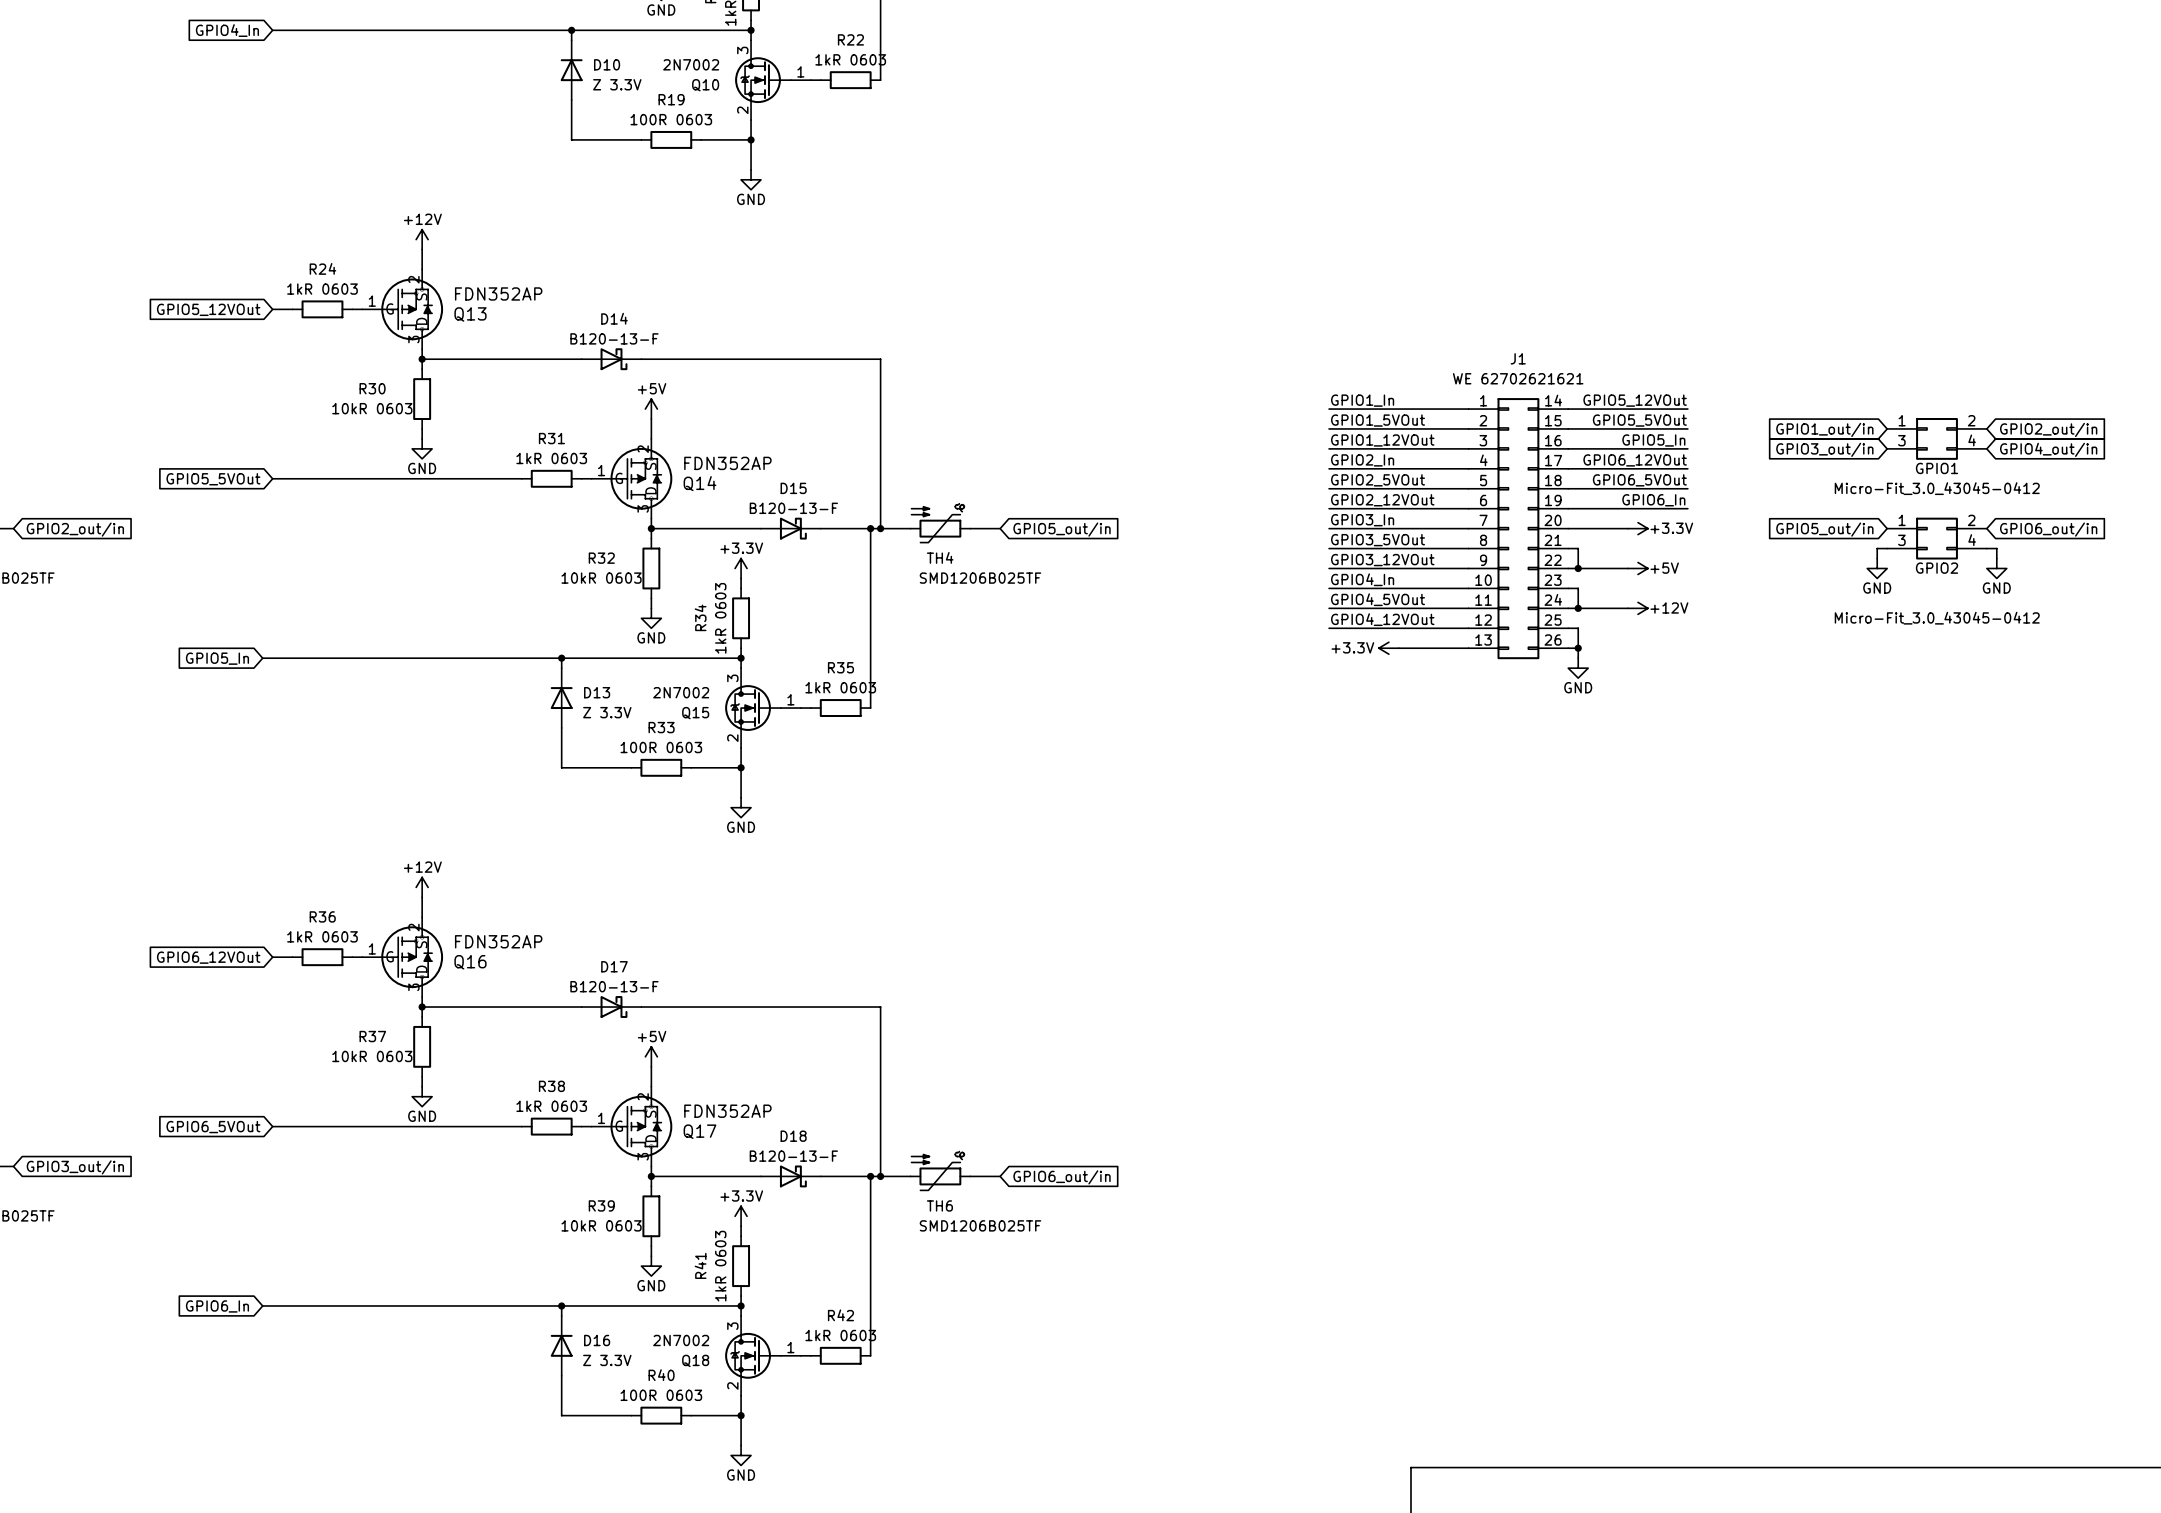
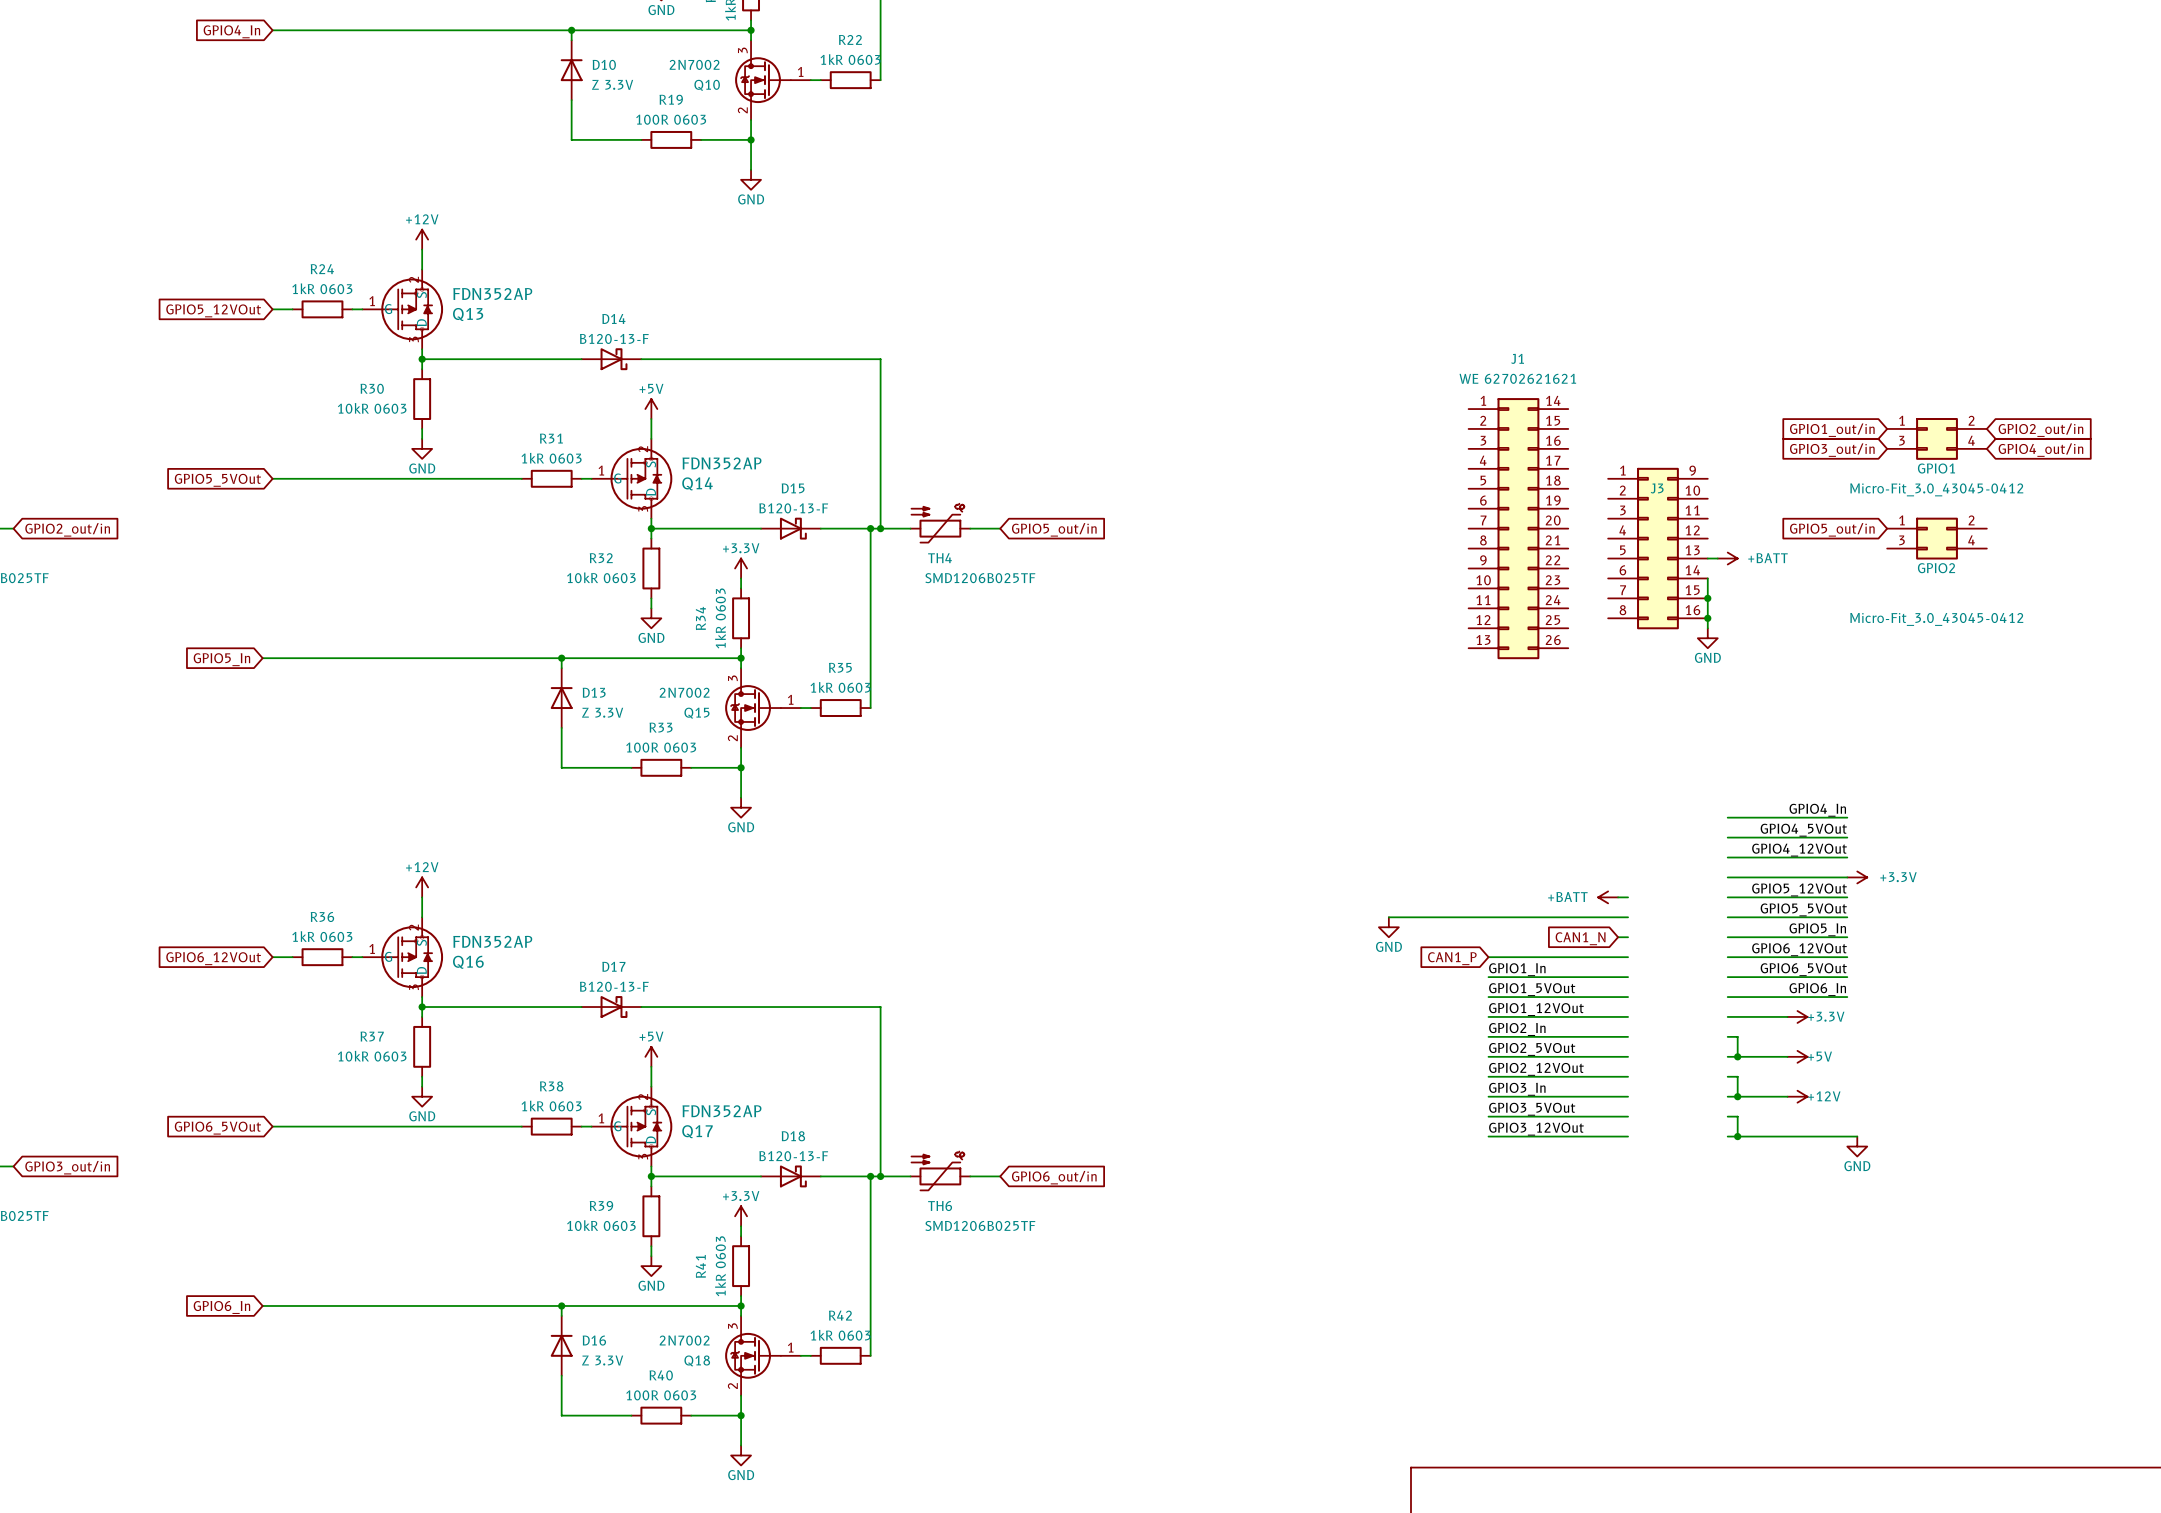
label: GPIO1_In (1362, 400) -> none
label: GPIO5_12VOut (1635, 400) -> none
wire: (1329, 409) (1468, 409) -> none
wire: (1568, 409) (1687, 409) -> none
label: GPIO1_5VOut (1378, 420) -> none
label: GPIO5_5VOut (1639, 420) -> none
wire: (1329, 428) (1468, 428) -> none
wire: (1568, 428) (1687, 428) -> none
label: GPIO1_12VOut (1382, 440) -> none
label: GPIO5_In (1653, 440) -> none
wire: (1329, 448) (1468, 448) -> none
wire: (1568, 448) (1687, 448) -> none
label: GPIO2_In (1362, 460) -> none
label: GPIO6_12VOut (1635, 460) -> none
wire: (1329, 468) (1468, 468) -> none
wire: (1568, 468) (1687, 468) -> none
label: GPIO2_5VOut (1378, 480) -> none
label: GPIO6_5VOut (1639, 480) -> none
wire: (1329, 488) (1468, 488) -> none
wire: (1568, 488) (1687, 488) -> none
label: GPIO2_12VOut (1382, 500) -> none
label: GPIO6_In (1653, 500) -> none
wire: (1329, 508) (1468, 508) -> none
wire: (1568, 508) (1687, 508) -> none
label: GPIO3_In (1362, 520) -> none
wire: (1329, 528) (1468, 528) -> none
wire: (1568, 528) (1628, 528) -> none
power symbol: +3.3V (1638, 528) -> none
global label: GPIO6_out/in (2048, 529) -> none
label: GPIO3_5VOut (1378, 540) -> none
wire: (1329, 548) (1468, 548) -> none
wire: (1568, 548) (1578, 548) (1578, 568) -> none
J3: none -> (1657, 548)
wire: (1887, 548) (1877, 548) (1877, 558) -> none
wire: (1986, 548) (1996, 548) (1996, 558) -> none
power symbol: none -> +BATT (1727, 558)
label: GPIO3_12VOut (1382, 560) -> none
wire: (1329, 568) (1468, 568) -> none
wire: (1568, 568) (1628, 568) -> none
junction: (1578, 568) -> none
power symbol: +5V (1638, 568) -> none
power symbol: GND (1877, 568) -> none
power symbol: GND (1996, 568) -> none
wire: none -> (1707, 578) (1707, 628)
label: GPIO4_In (1362, 579) -> none
wire: (1329, 588) (1468, 588) -> none
wire: (1568, 588) (1578, 588) (1578, 608) -> none
junction: none -> (1707, 598)
label: GPIO4_5VOut (1378, 599) -> none
wire: (1329, 608) (1468, 608) -> none
wire: (1568, 608) (1628, 608) -> none
junction: (1578, 608) -> none
power symbol: +12V (1638, 608) -> none
junction: none -> (1707, 618)
label: GPIO4_12VOut (1382, 619) -> none
wire: (1329, 628) (1468, 628) -> none
wire: (1568, 628) (1578, 628) (1578, 658) -> none
power symbol: none -> GND (1707, 638)
power symbol: +3.3V (1388, 648) -> none
wire: (1398, 648) (1468, 648) -> none
wire: (1568, 648) (1578, 648) -> (1707, 558) (1717, 558)
junction: (1578, 648) -> none
power symbol: GND (1578, 668) -> none
label: none -> GPIO4_In (1817, 810)
wire: none -> (1727, 817) (1847, 817)
label: none -> GPIO4_5VOut (1803, 830)
wire: none -> (1727, 837) (1847, 837)
label: none -> GPIO4_12VOut (1799, 850)
wire: none -> (1727, 857) (1847, 857)
wire: none -> (1727, 877) (1847, 877)
power symbol: none -> +3.3V (1857, 877)
label: none -> GPIO5_12VOut (1799, 889)
power symbol: none -> +BATT (1608, 897)
wire: none -> (1618, 897) (1628, 897)
wire: none -> (1727, 897) (1847, 897)
label: none -> GPIO5_5VOut (1803, 909)
wire: none -> (1388, 917) (1628, 917)
wire: none -> (1727, 917) (1847, 917)
power symbol: none -> GND (1388, 927)
label: none -> GPIO5_In (1817, 929)
global label: none -> CAN1_N (1580, 938)
wire: none -> (1618, 937) (1628, 937)
wire: none -> (1727, 937) (1847, 937)
label: none -> GPIO6_12VOut (1799, 949)
global label: none -> CAN1_P (1452, 958)
wire: none -> (1488, 957) (1628, 957)
wire: none -> (1727, 957) (1847, 957)
label: none -> GPIO1_In (1517, 969)
label: none -> GPIO6_5VOut (1803, 969)
wire: none -> (1488, 977) (1628, 977)
wire: none -> (1727, 977) (1847, 977)
label: none -> GPIO1_5VOut (1532, 989)
label: none -> GPIO6_In (1817, 989)
wire: none -> (1488, 997) (1628, 997)
wire: none -> (1727, 997) (1847, 997)
label: none -> GPIO1_12VOut (1536, 1009)
wire: none -> (1488, 1016) (1628, 1016)
wire: none -> (1727, 1016) (1787, 1016)
power symbol: none -> +3.3V (1797, 1016)
label: none -> GPIO2_In (1517, 1029)
wire: none -> (1488, 1036) (1628, 1036)
wire: none -> (1727, 1036) (1737, 1036) (1737, 1056)
label: none -> GPIO2_5VOut (1532, 1049)
wire: none -> (1488, 1056) (1628, 1056)
wire: none -> (1727, 1056) (1787, 1056)
junction: none -> (1737, 1056)
power symbol: none -> +5V (1797, 1056)
label: none -> GPIO2_12VOut (1536, 1069)
wire: none -> (1488, 1076) (1628, 1076)
wire: none -> (1727, 1076) (1737, 1076) (1737, 1096)
label: none -> GPIO3_In (1517, 1089)
wire: none -> (1488, 1096) (1628, 1096)
wire: none -> (1727, 1096) (1787, 1096)
junction: none -> (1737, 1096)
power symbol: none -> +12V (1797, 1096)
label: none -> GPIO3_5VOut (1532, 1109)
wire: none -> (1488, 1116) (1628, 1116)
wire: none -> (1727, 1116) (1737, 1116) (1737, 1136)
label: none -> GPIO3_12VOut (1536, 1129)
wire: none -> (1488, 1136) (1628, 1136)
wire: none -> (1727, 1136) (1857, 1136)
junction: none -> (1737, 1136)
power symbol: none -> GND (1857, 1146)

